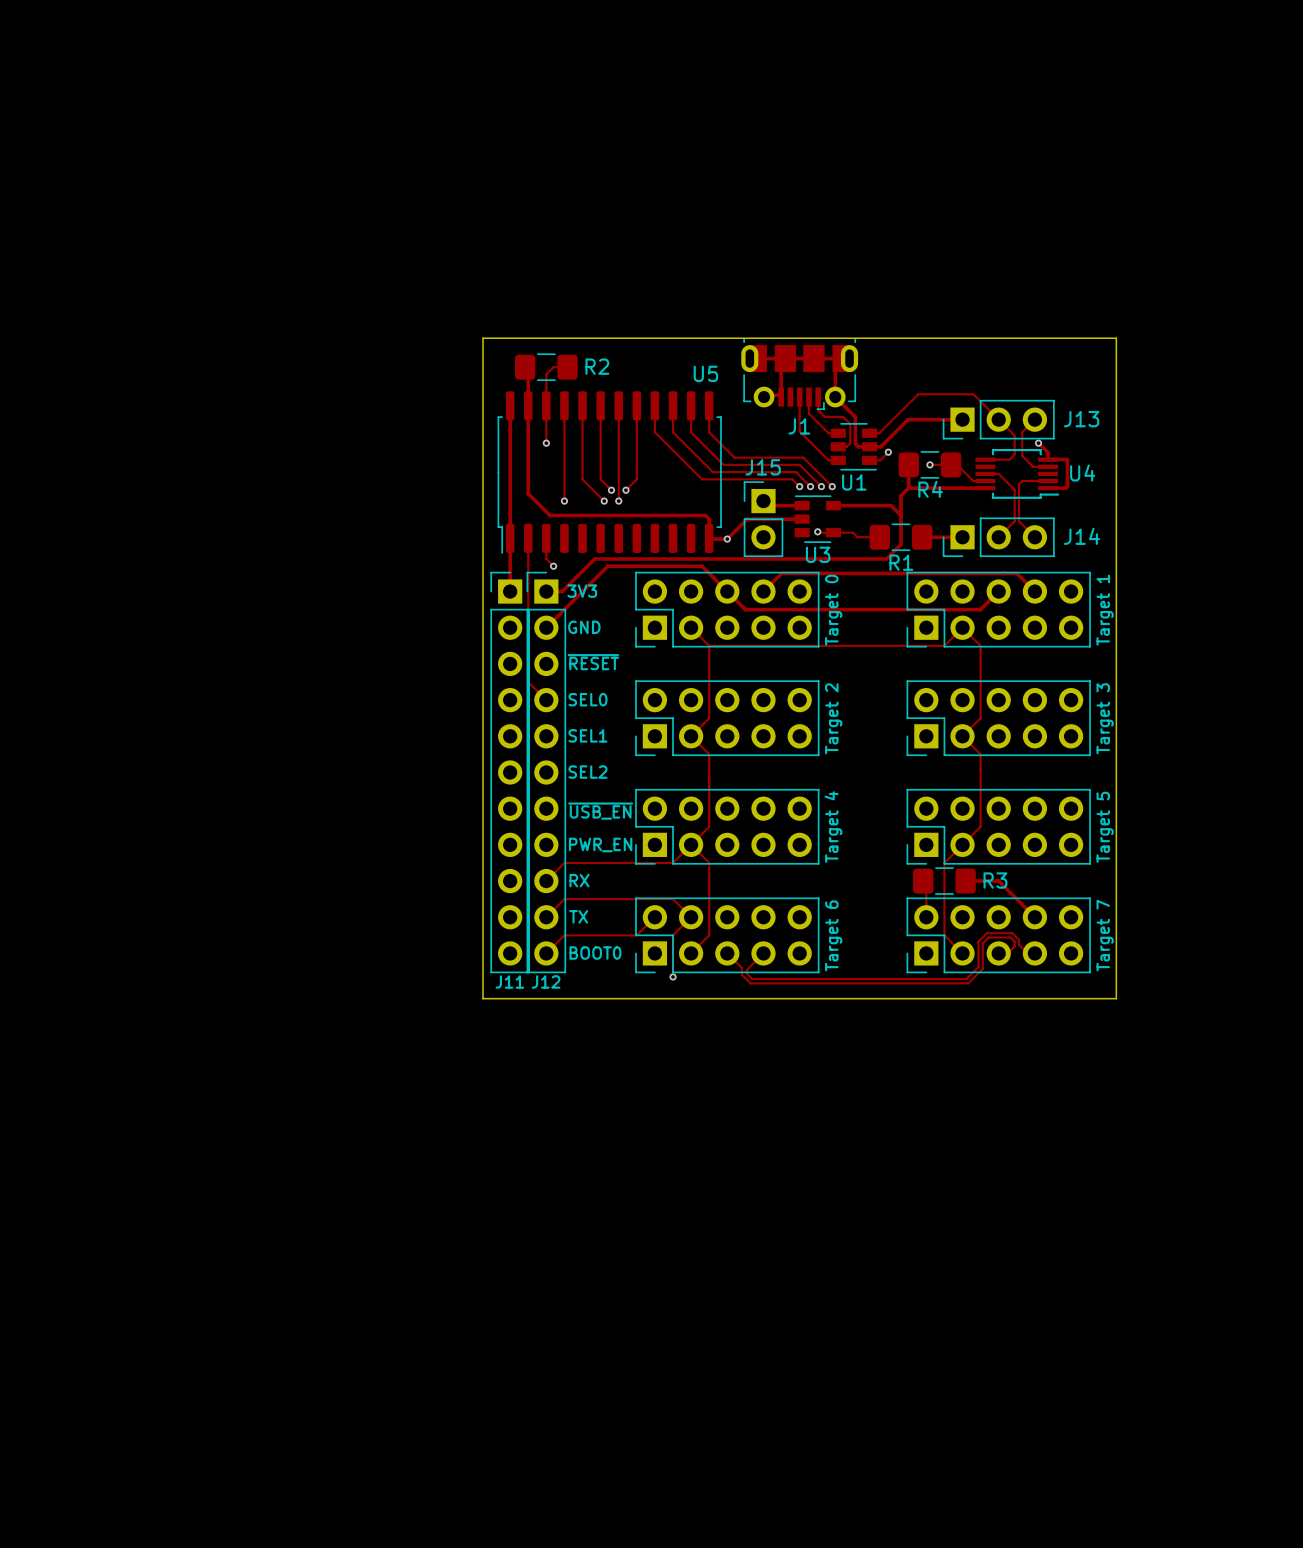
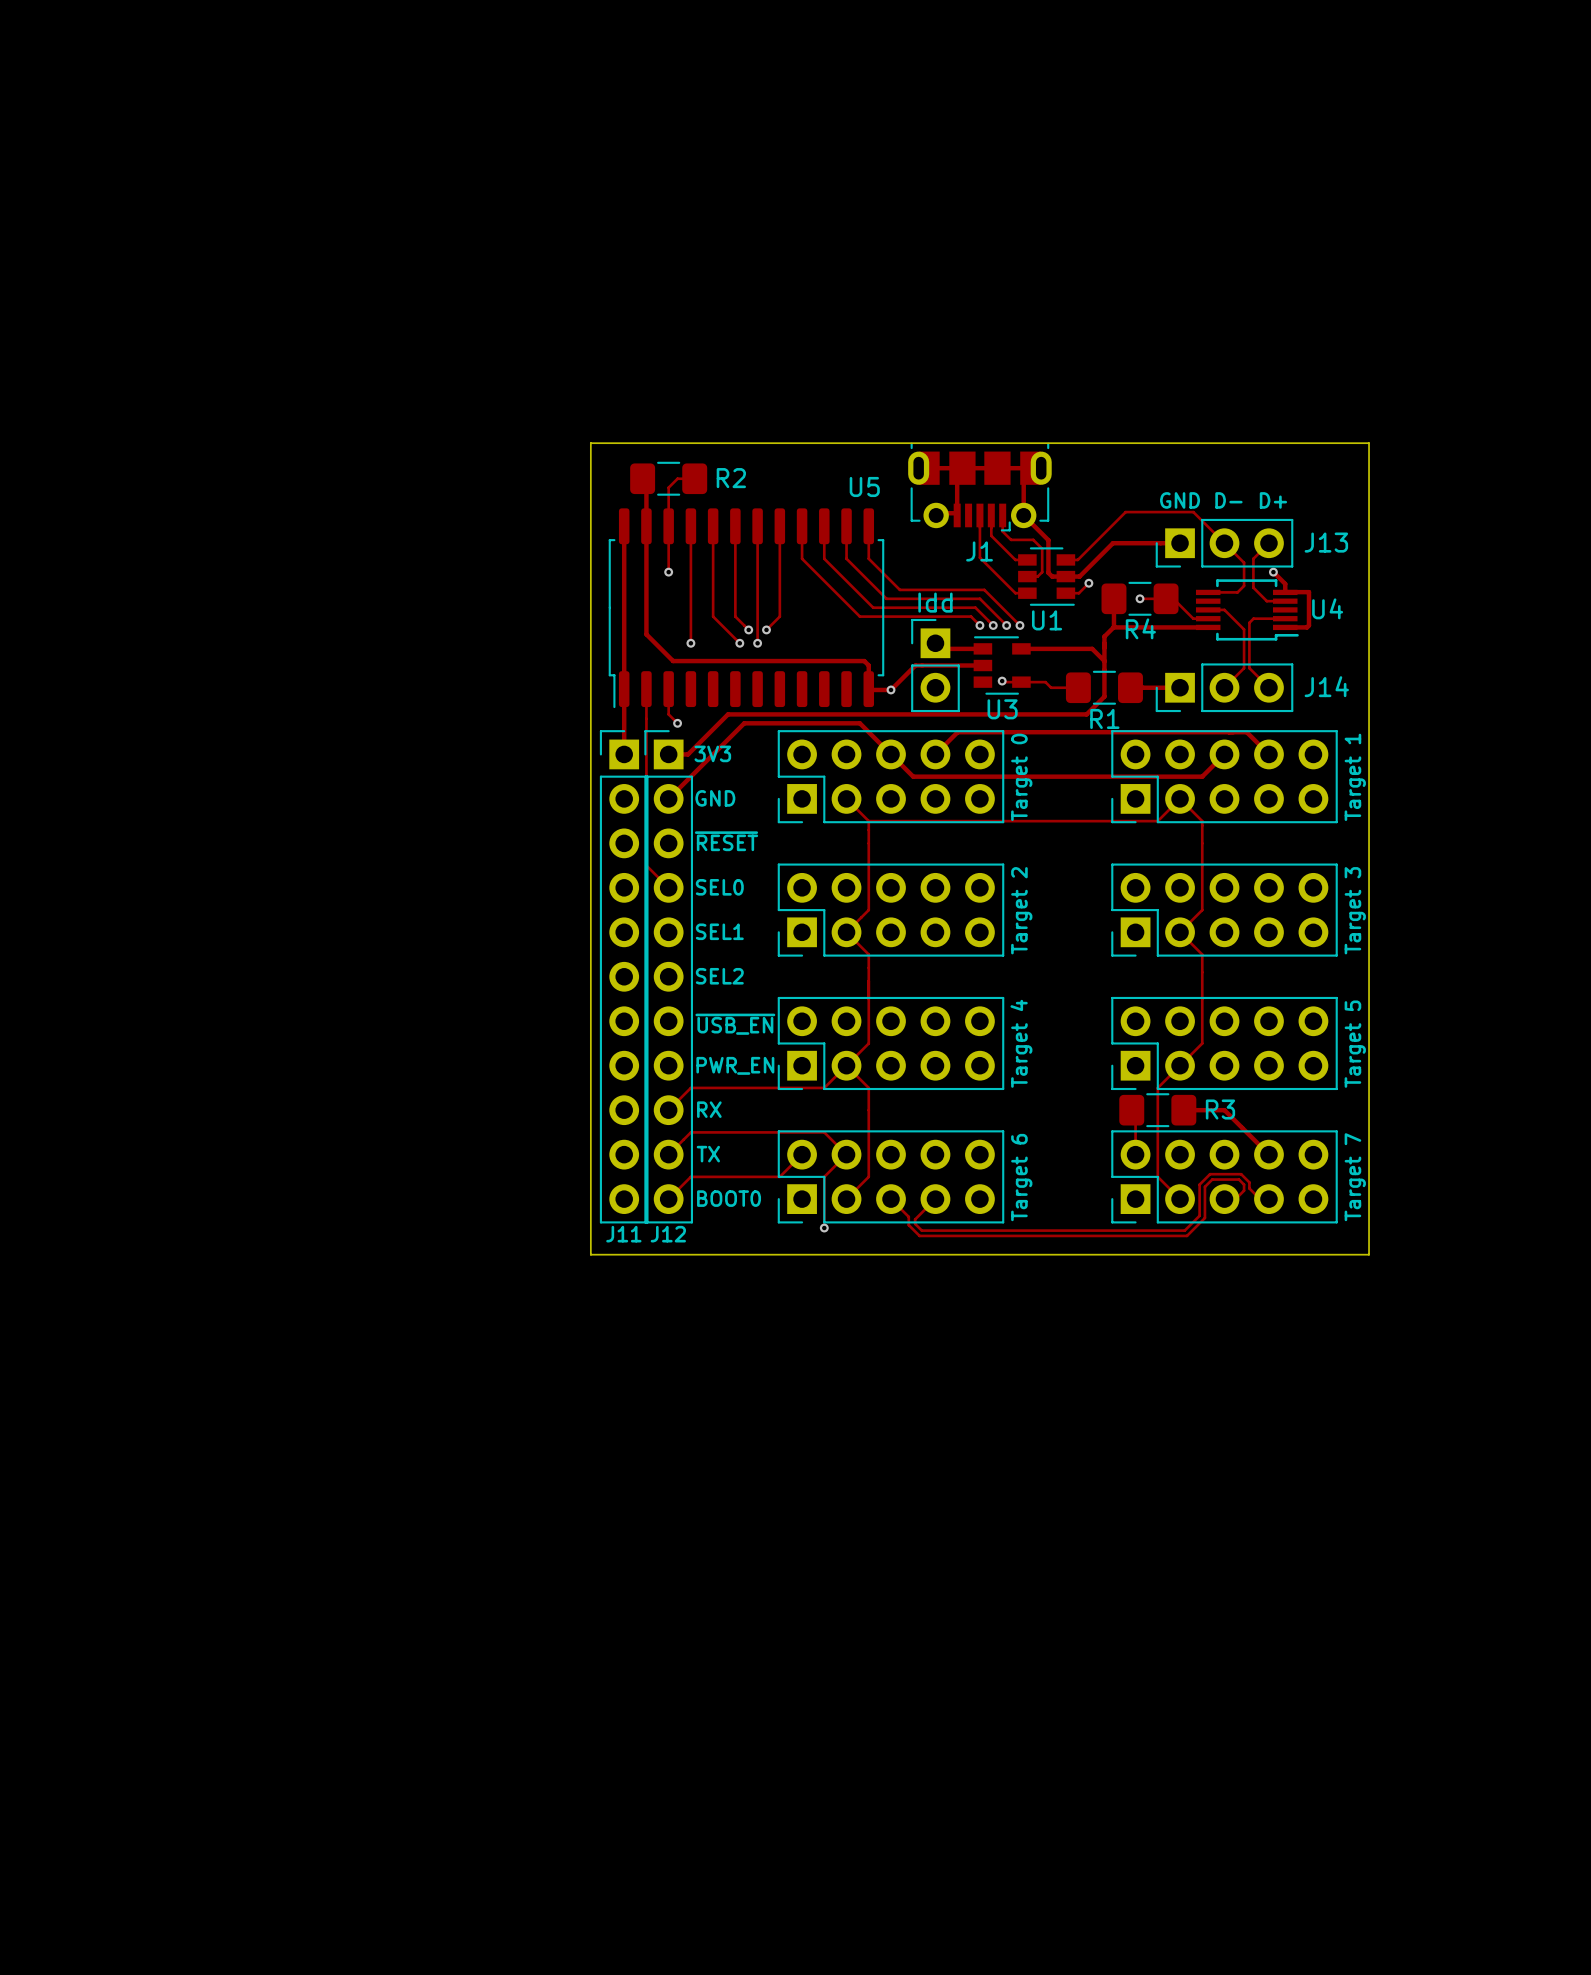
text: none -> GND (1180, 500)
text: none -> D- (1228, 500)
text: none -> D+ (1273, 500)
J15 name: J15 (763, 467) -> none
J15 value: none -> Idd (935, 602)

